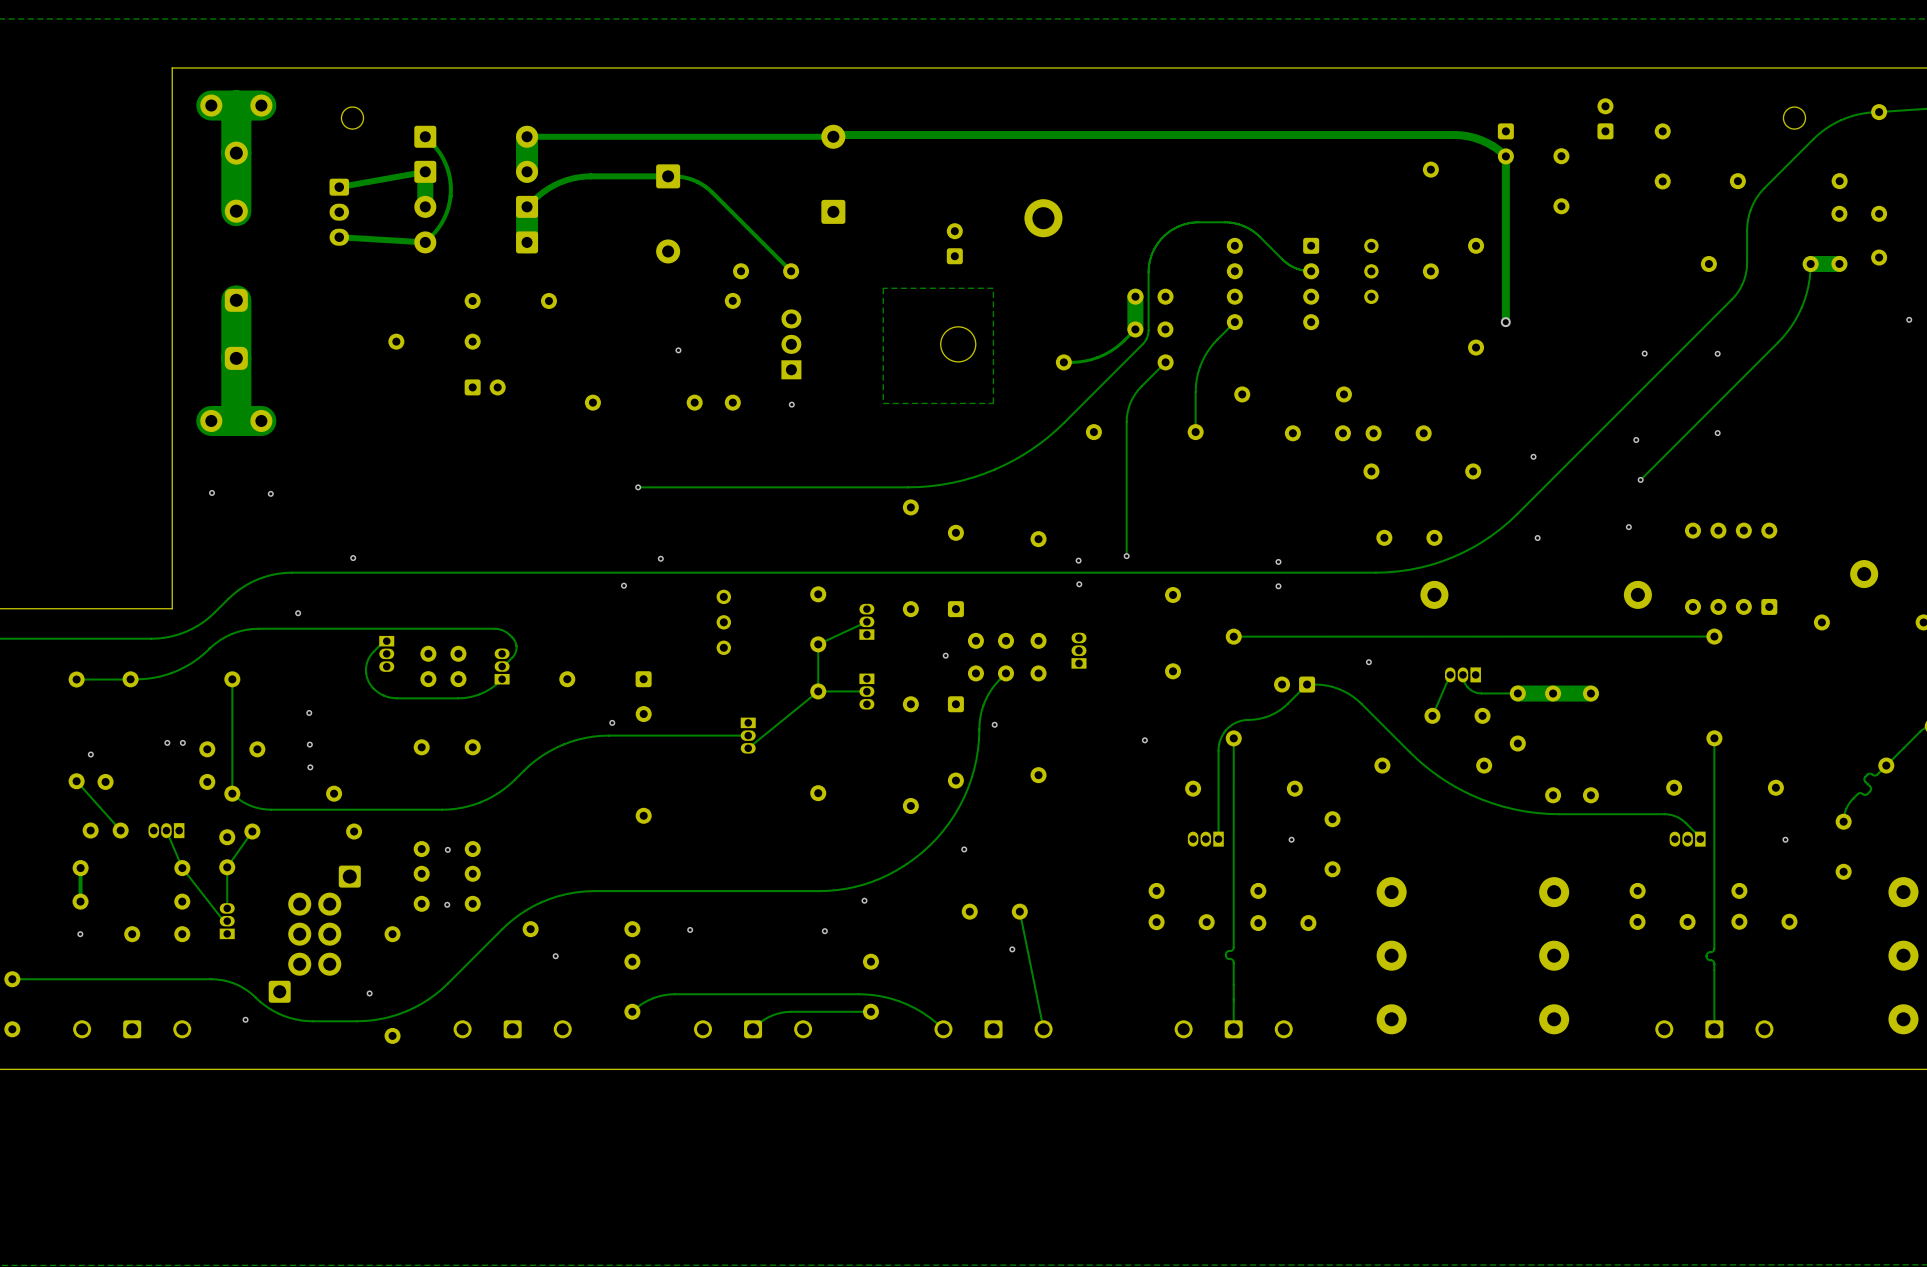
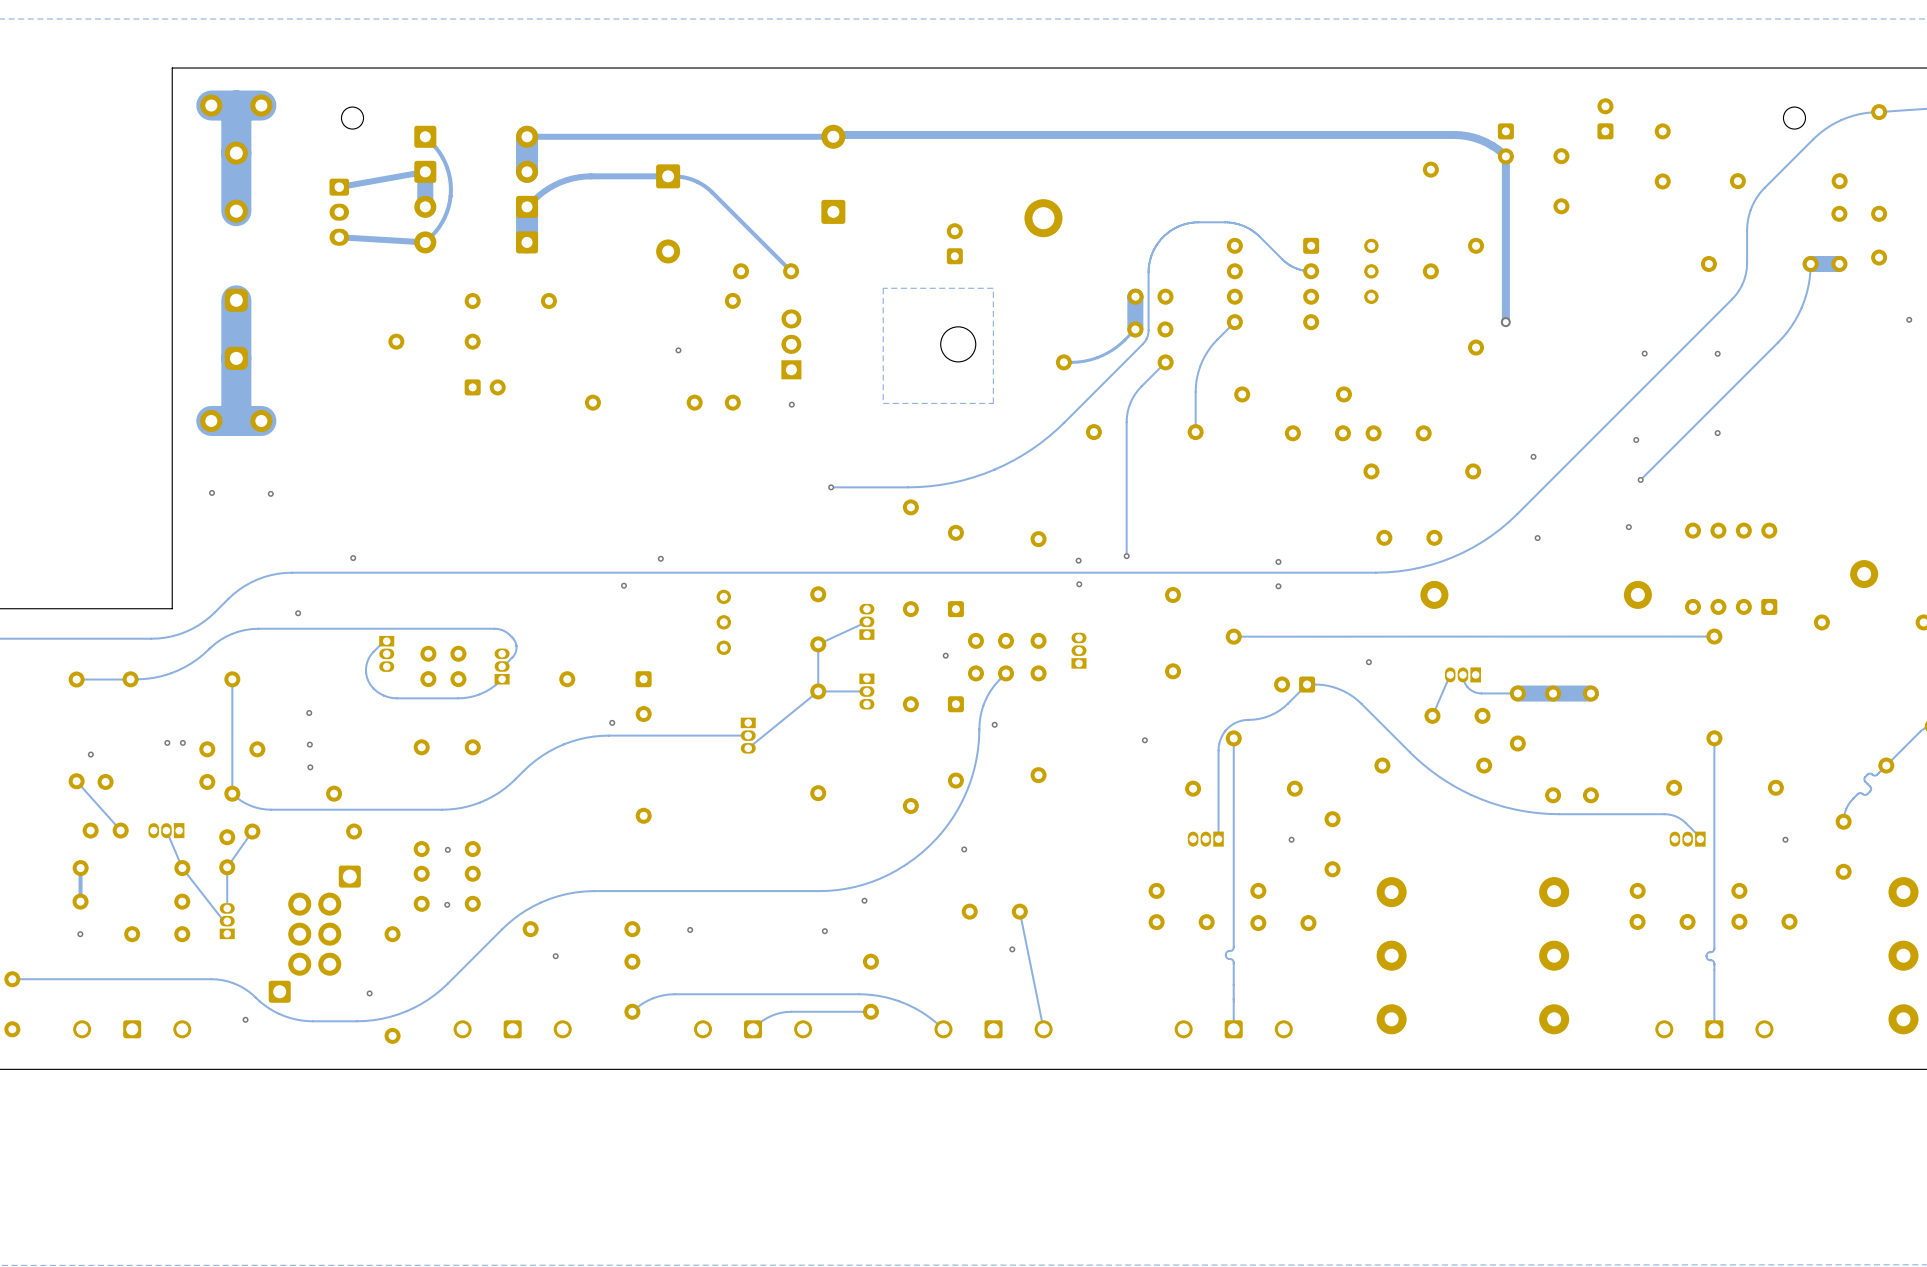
via: (638, 487) -> none
track: (831, 487) (638, 487) -> none
via: none -> (831, 487)

